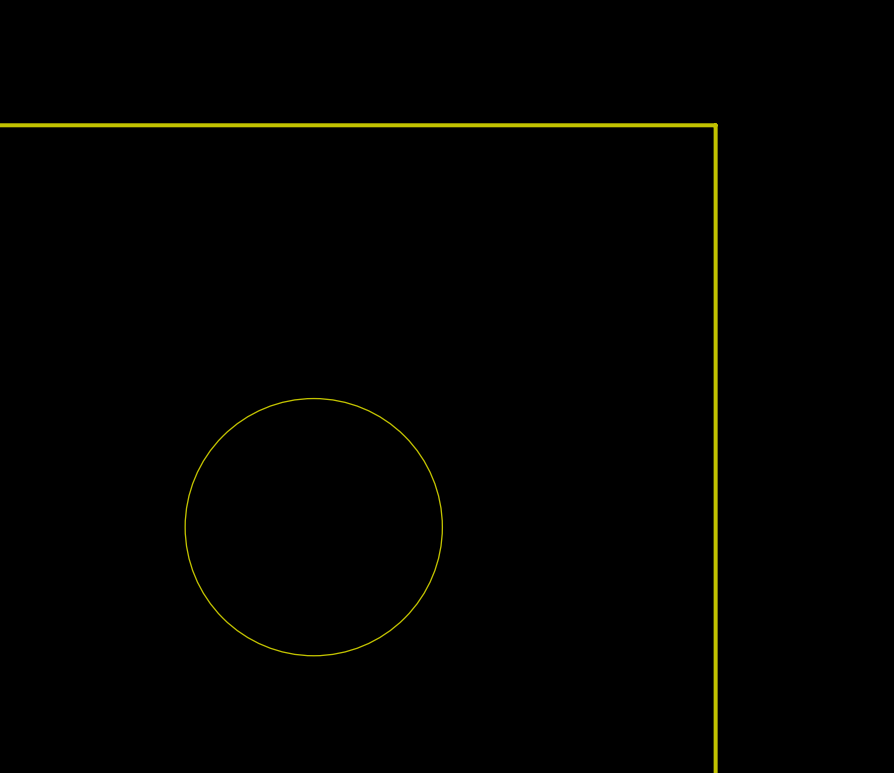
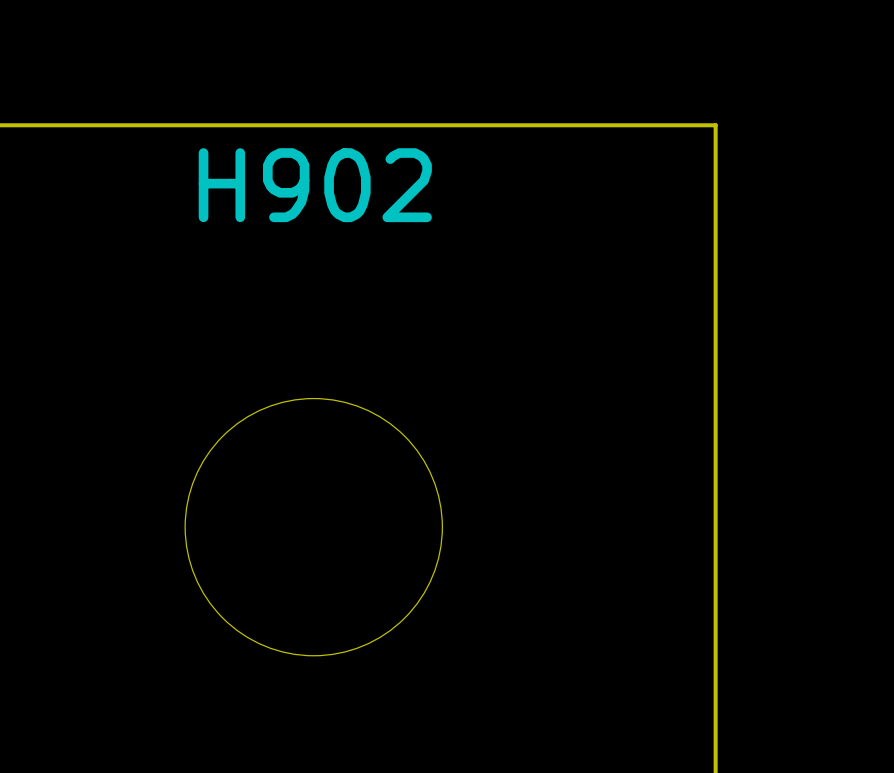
H902 name: none -> H902 (315, 185)

